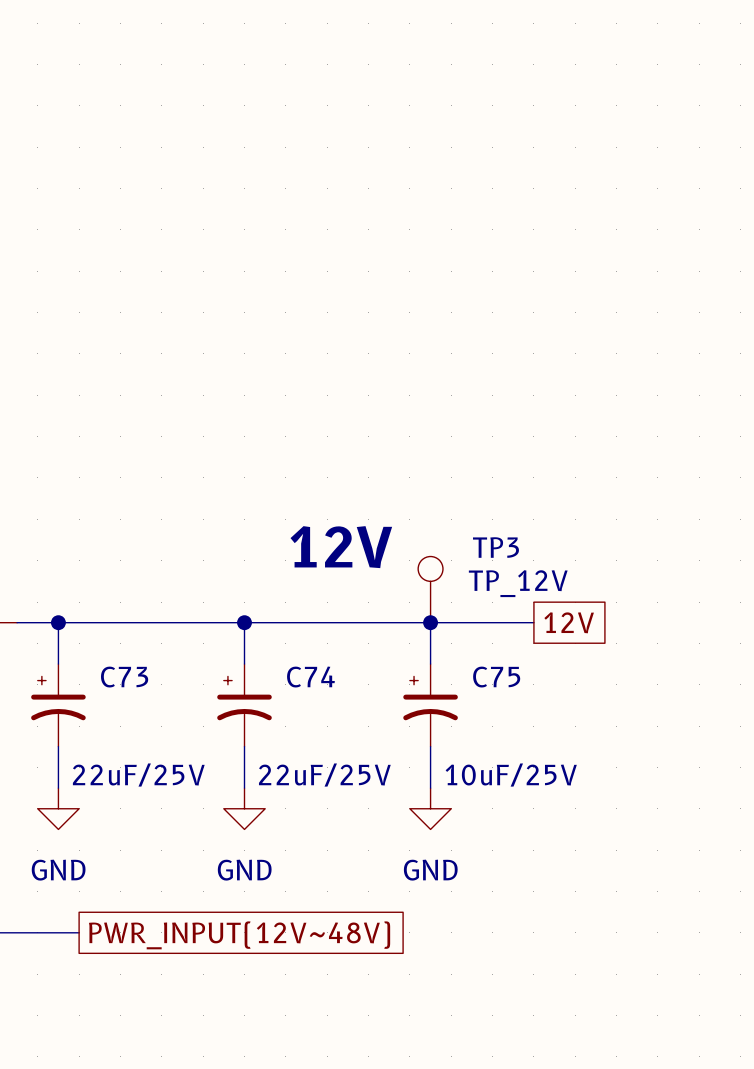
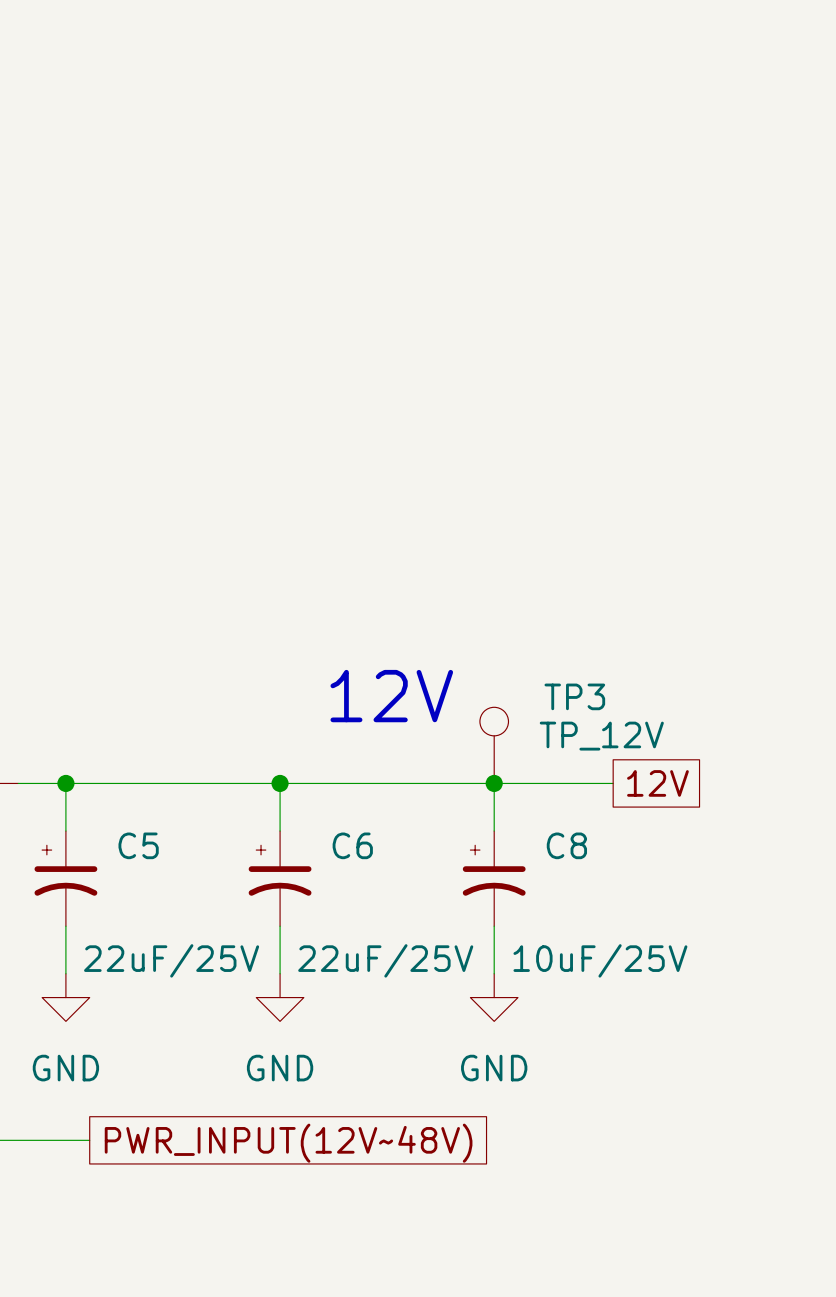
C73 name: C73 (124, 677) -> C5 (138, 845)
C74 name: C74 (310, 677) -> C6 (352, 845)
C75 name: C75 (496, 677) -> C8 (566, 845)

